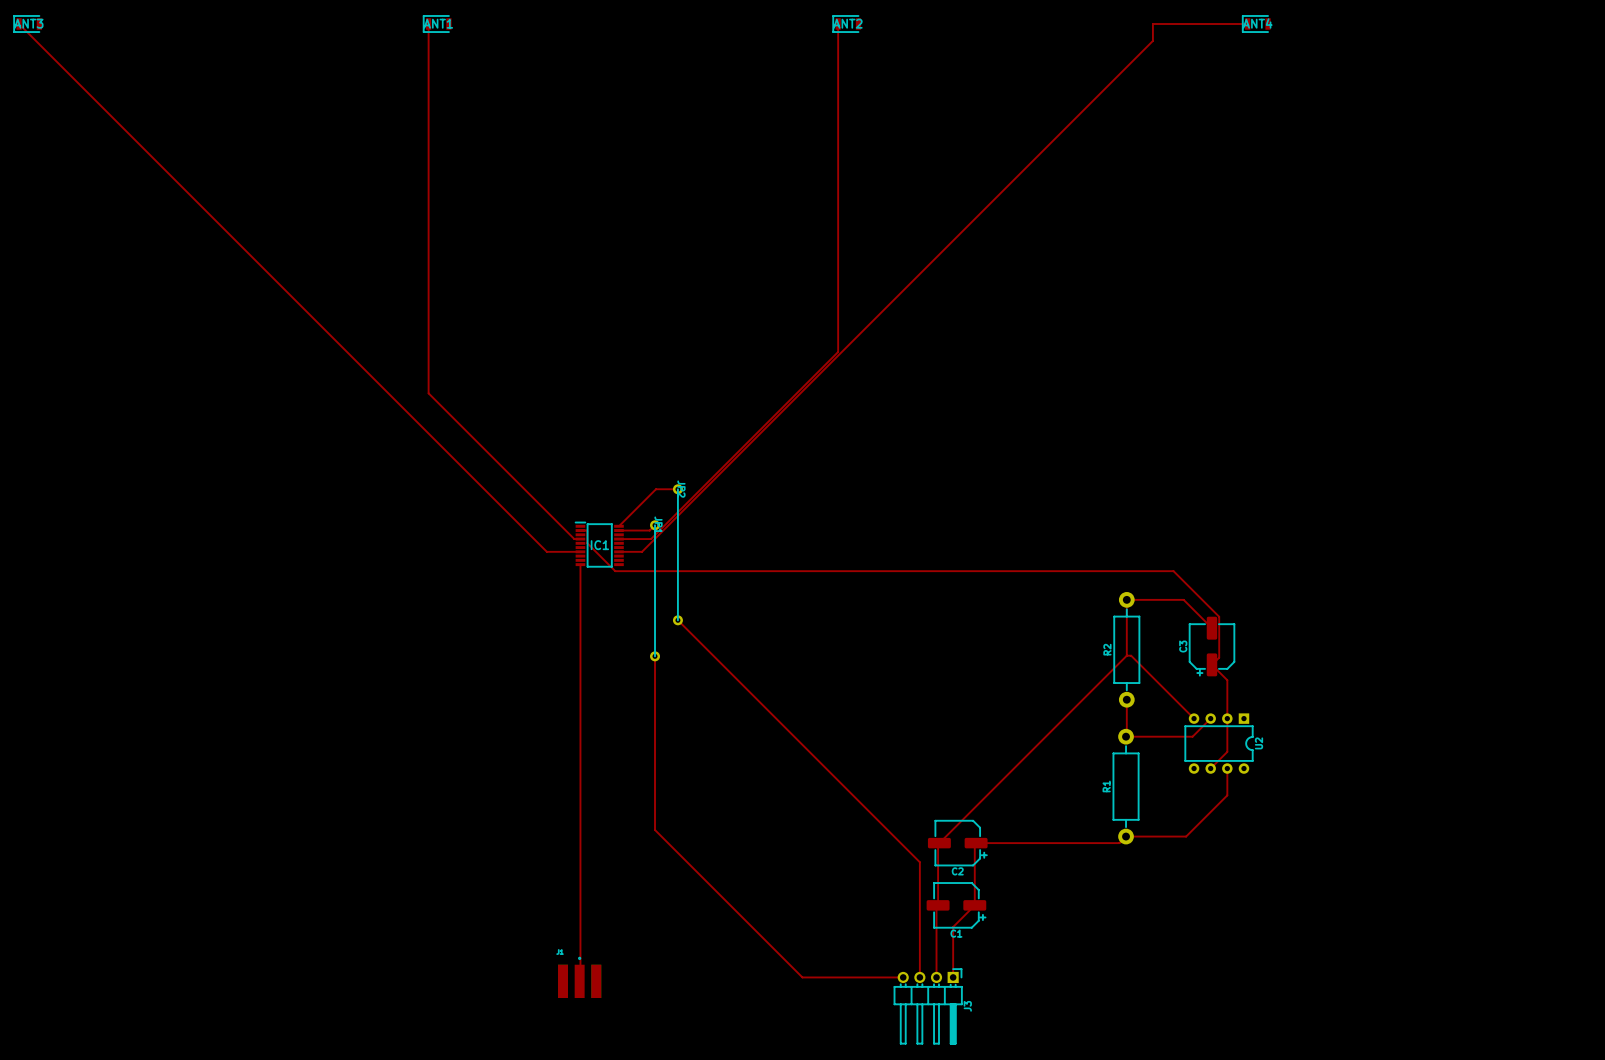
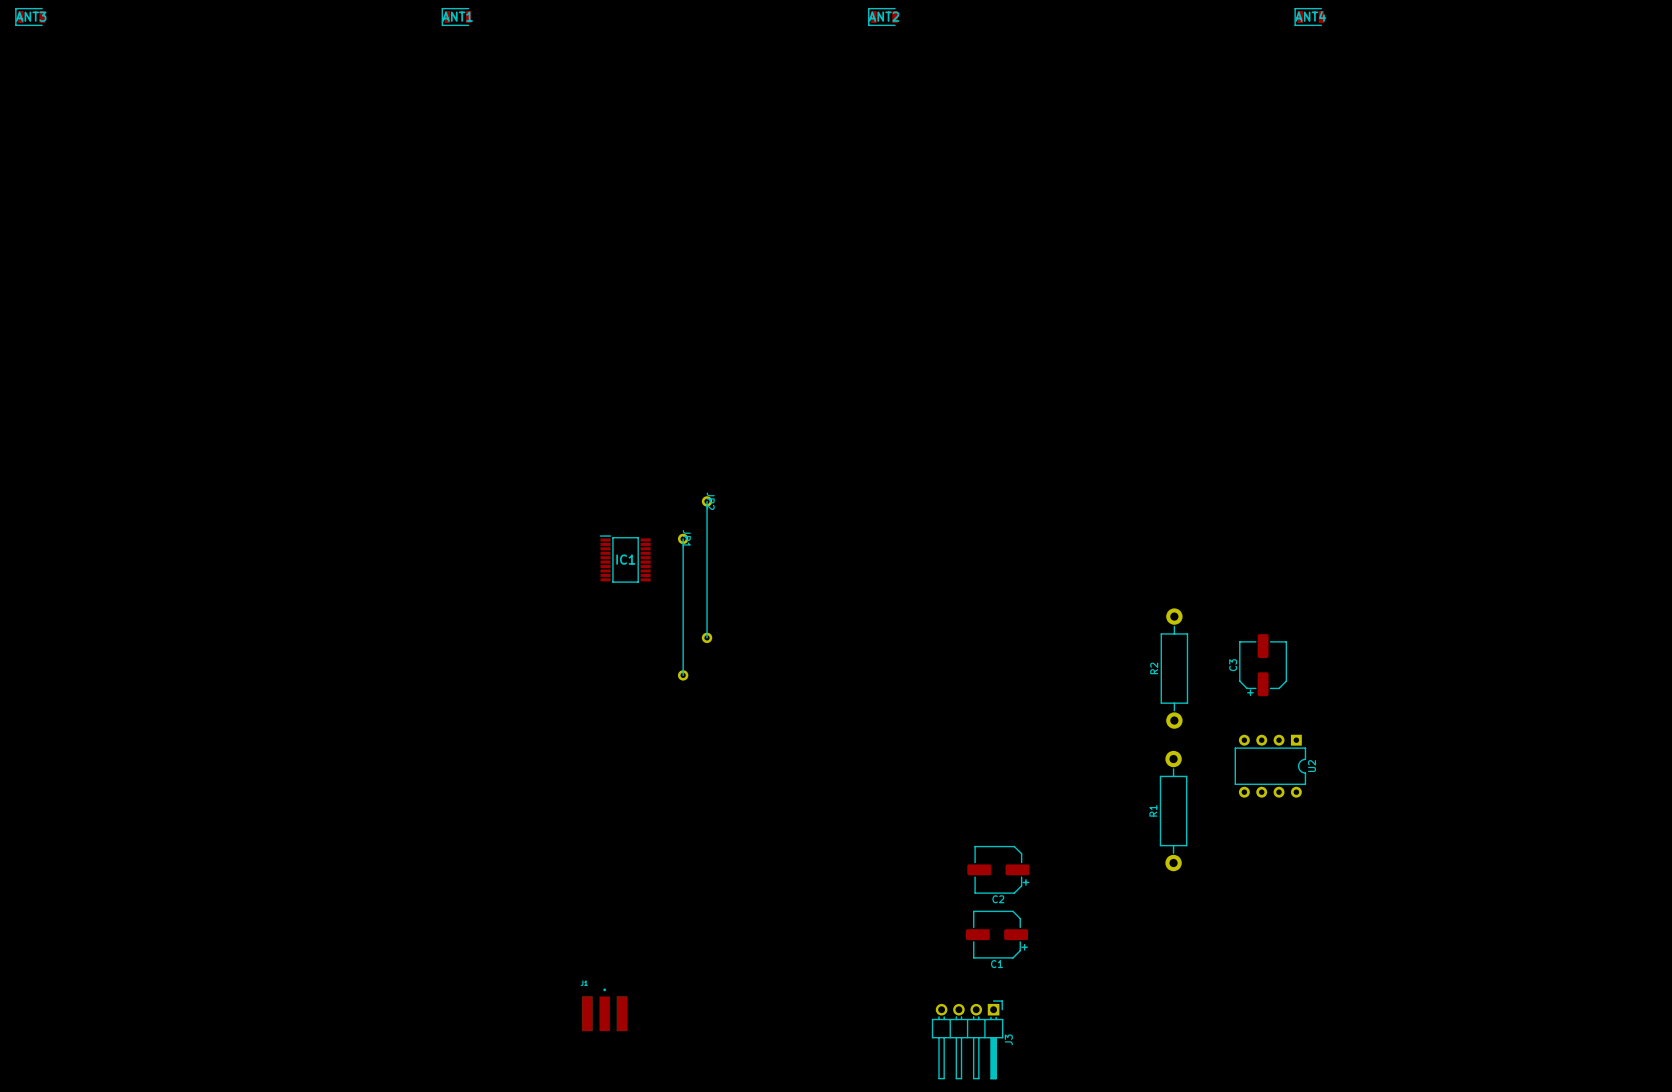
top track: (19, 24) (546, 551) (580, 551) -> none
top track: (428, 24) (428, 393) (574, 539) (580, 539) -> none
top track: (838, 24) (838, 351) (651, 539) (618, 539) -> none
top track: (1247, 24) (1152, 24) (1152, 40) (642, 551) (618, 551) -> none
top track: (677, 489) (655, 489) (618, 526) -> none
top track: (655, 525) (649, 530) (618, 530) -> none
top track: (580, 530) (587, 531) (587, 543) (615, 571) (1173, 571) (1219, 616) (1219, 657) (1212, 664) (1227, 680) (1227, 751) (1210, 768) -> none
top track: (580, 564) (579, 981) -> none
top track: (677, 620) (919, 862) (919, 977) -> none
top track: (1212, 628) (1183, 599) (1126, 599) (1126, 655) -> none
top track: (1126, 655) (939, 843) -> none
top track: (1126, 655) (1131, 655) (1194, 718) -> none
top track: (655, 656) (655, 830) (802, 977) (903, 977) -> none
top track: (1126, 699) (1126, 736) (1192, 736) (1210, 718) -> none
top track: (1227, 768) (1227, 795) (1186, 836) (1126, 836) (1119, 843) (976, 843) -> none
top track: (936, 839) (938, 841) (936, 977) -> none
top track: (972, 839) (974, 841) (974, 905) (953, 926) (953, 977) -> none

